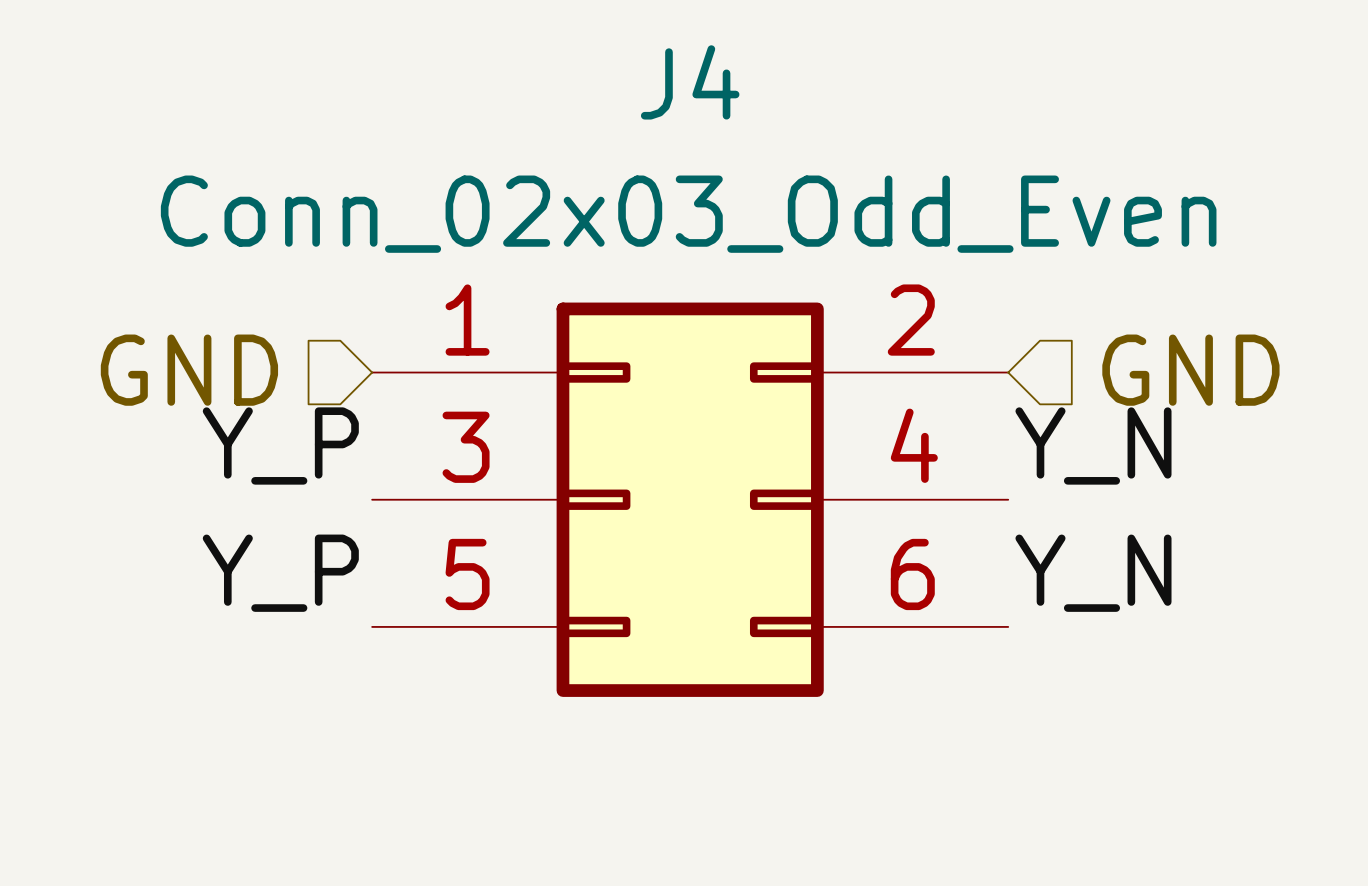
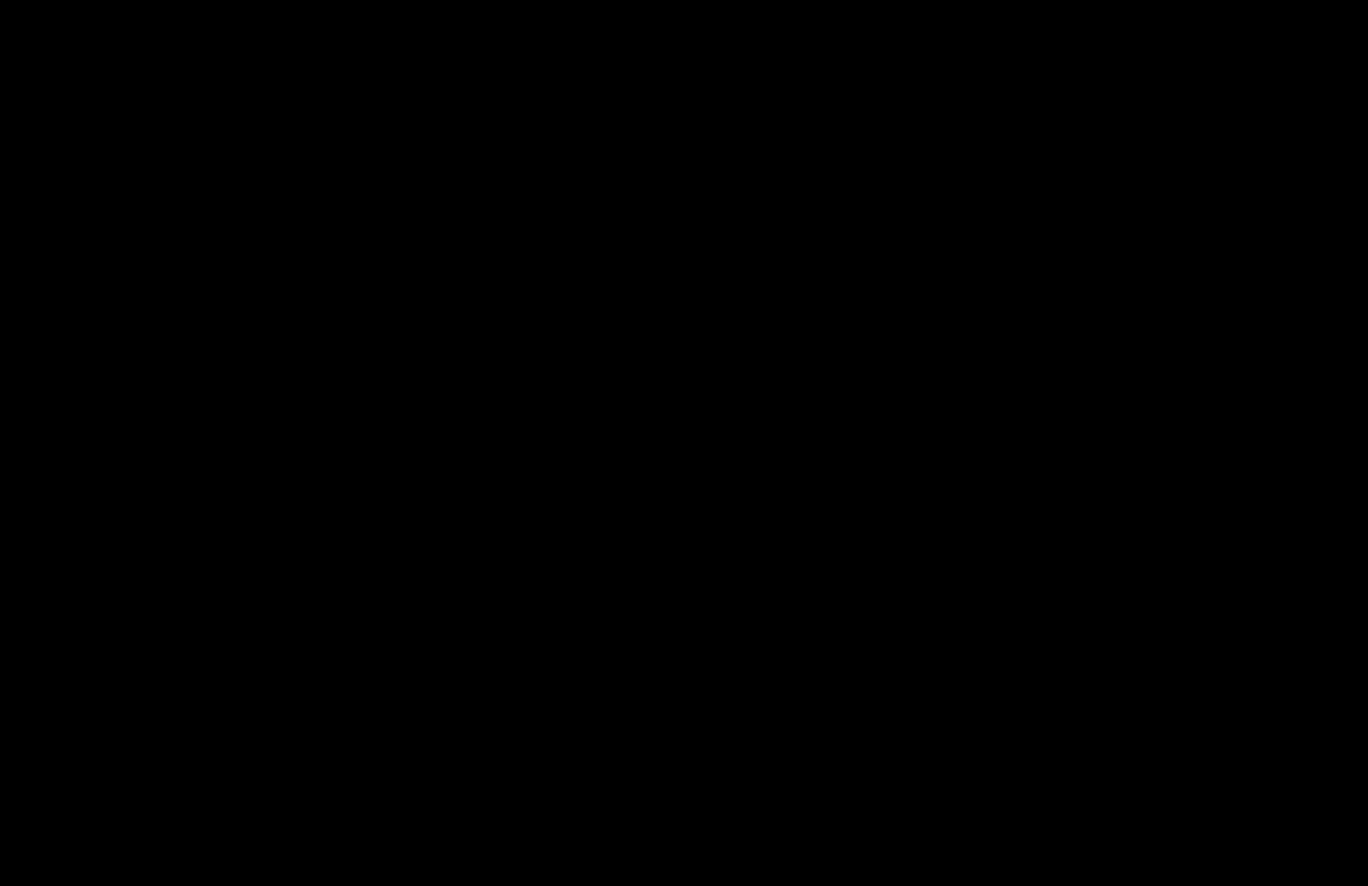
hierarchical label: GND (189, 370) -> none
hierarchical label: GND (1190, 370) -> none
label: Y_P (280, 446) -> none
label: Y_N (1093, 446) -> none
J4: Conn_02x03_Odd_Even (690, 499) -> none
label: Y_P (280, 573) -> none
label: Y_N (1093, 573) -> none

